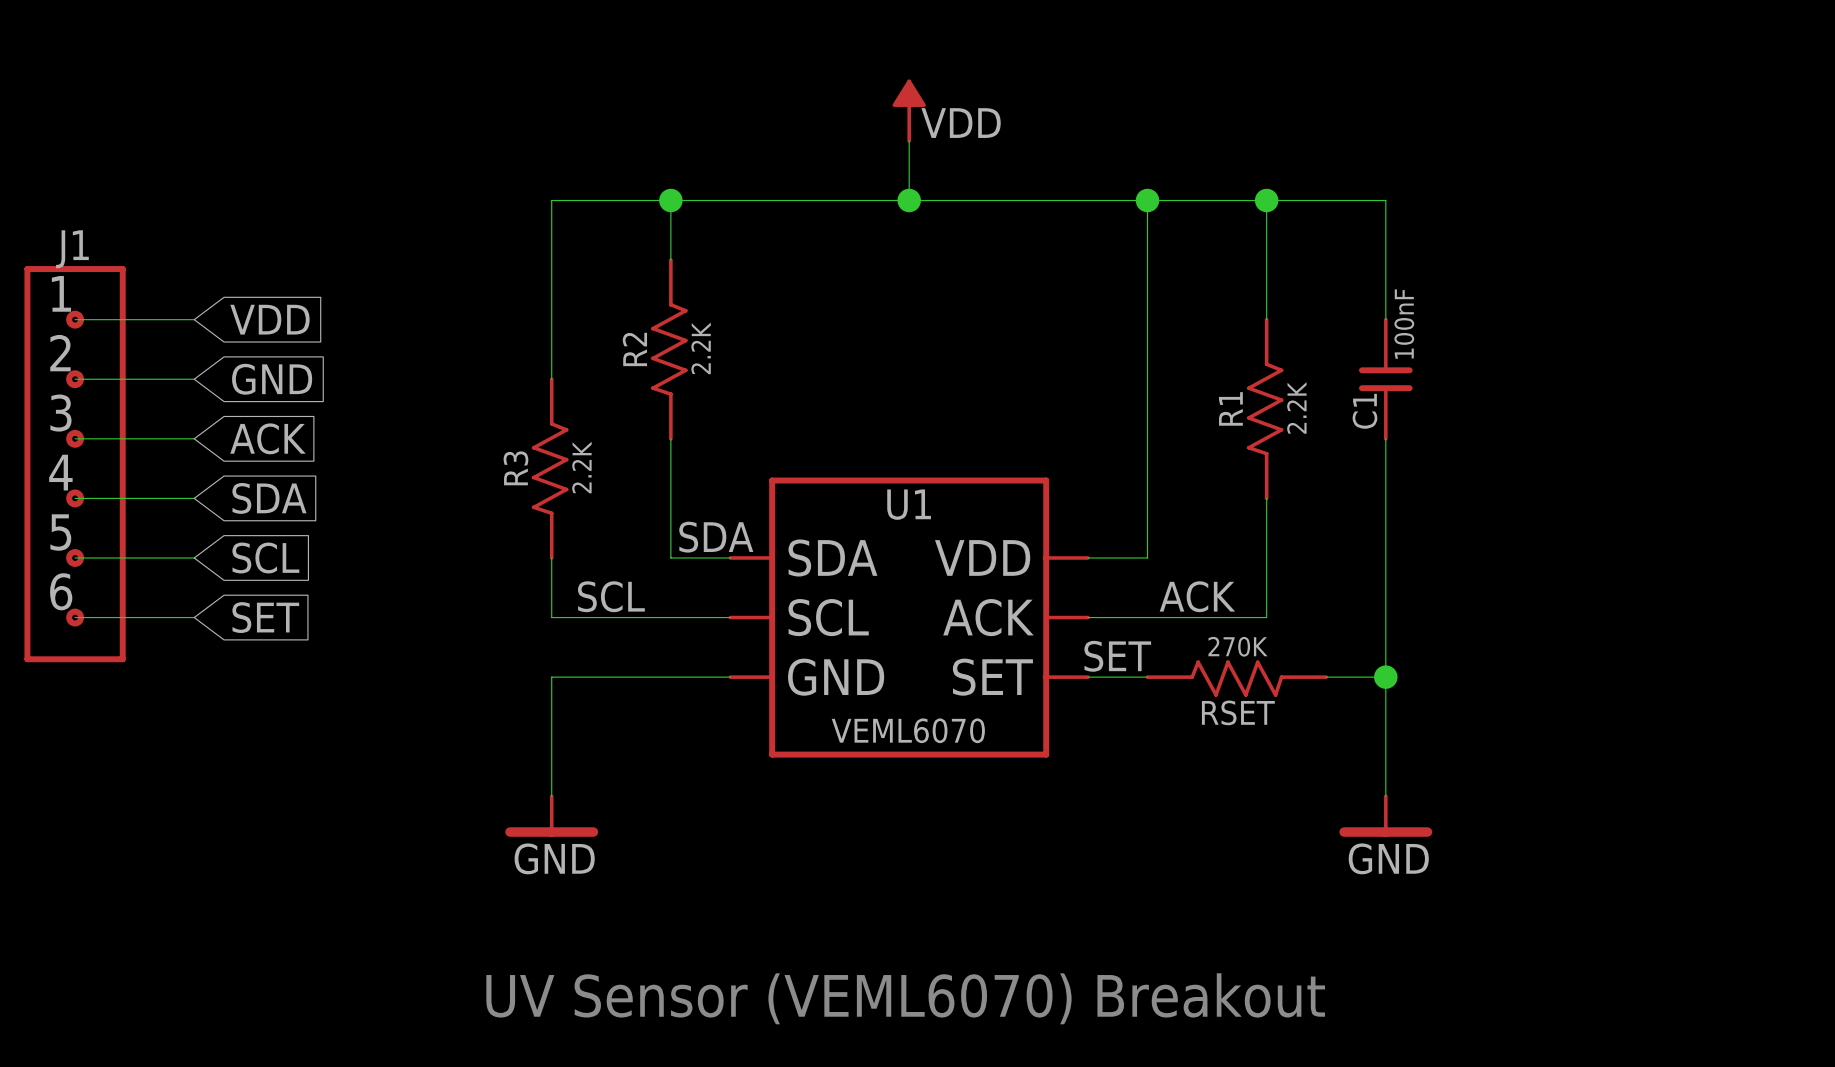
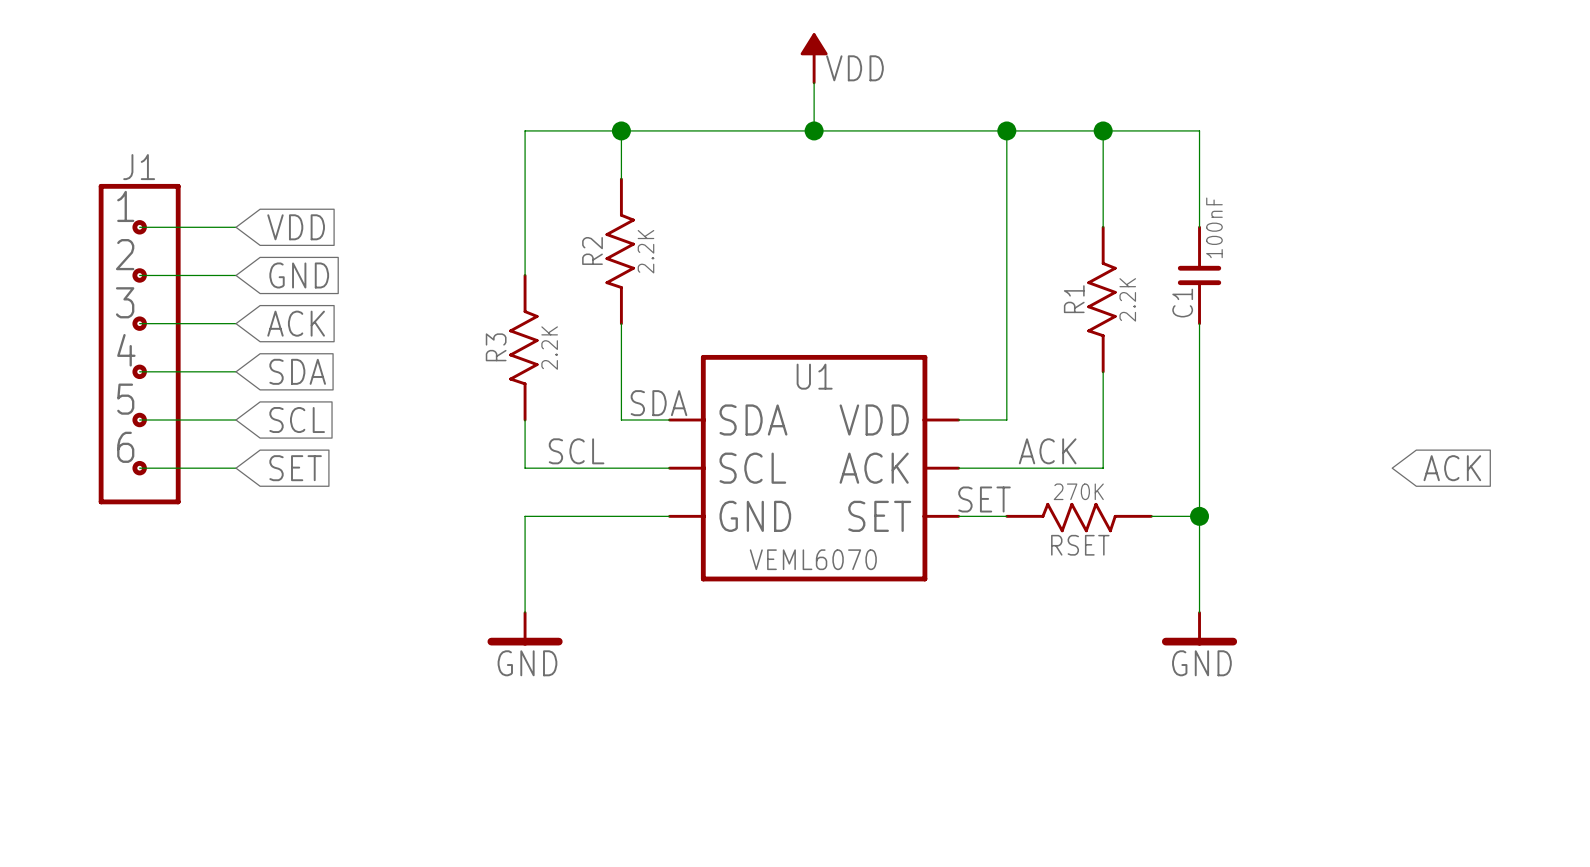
global label: none -> ACK (1452, 468)
text: UV Sensor (VEML6070) Breakout (905, 998) -> none

